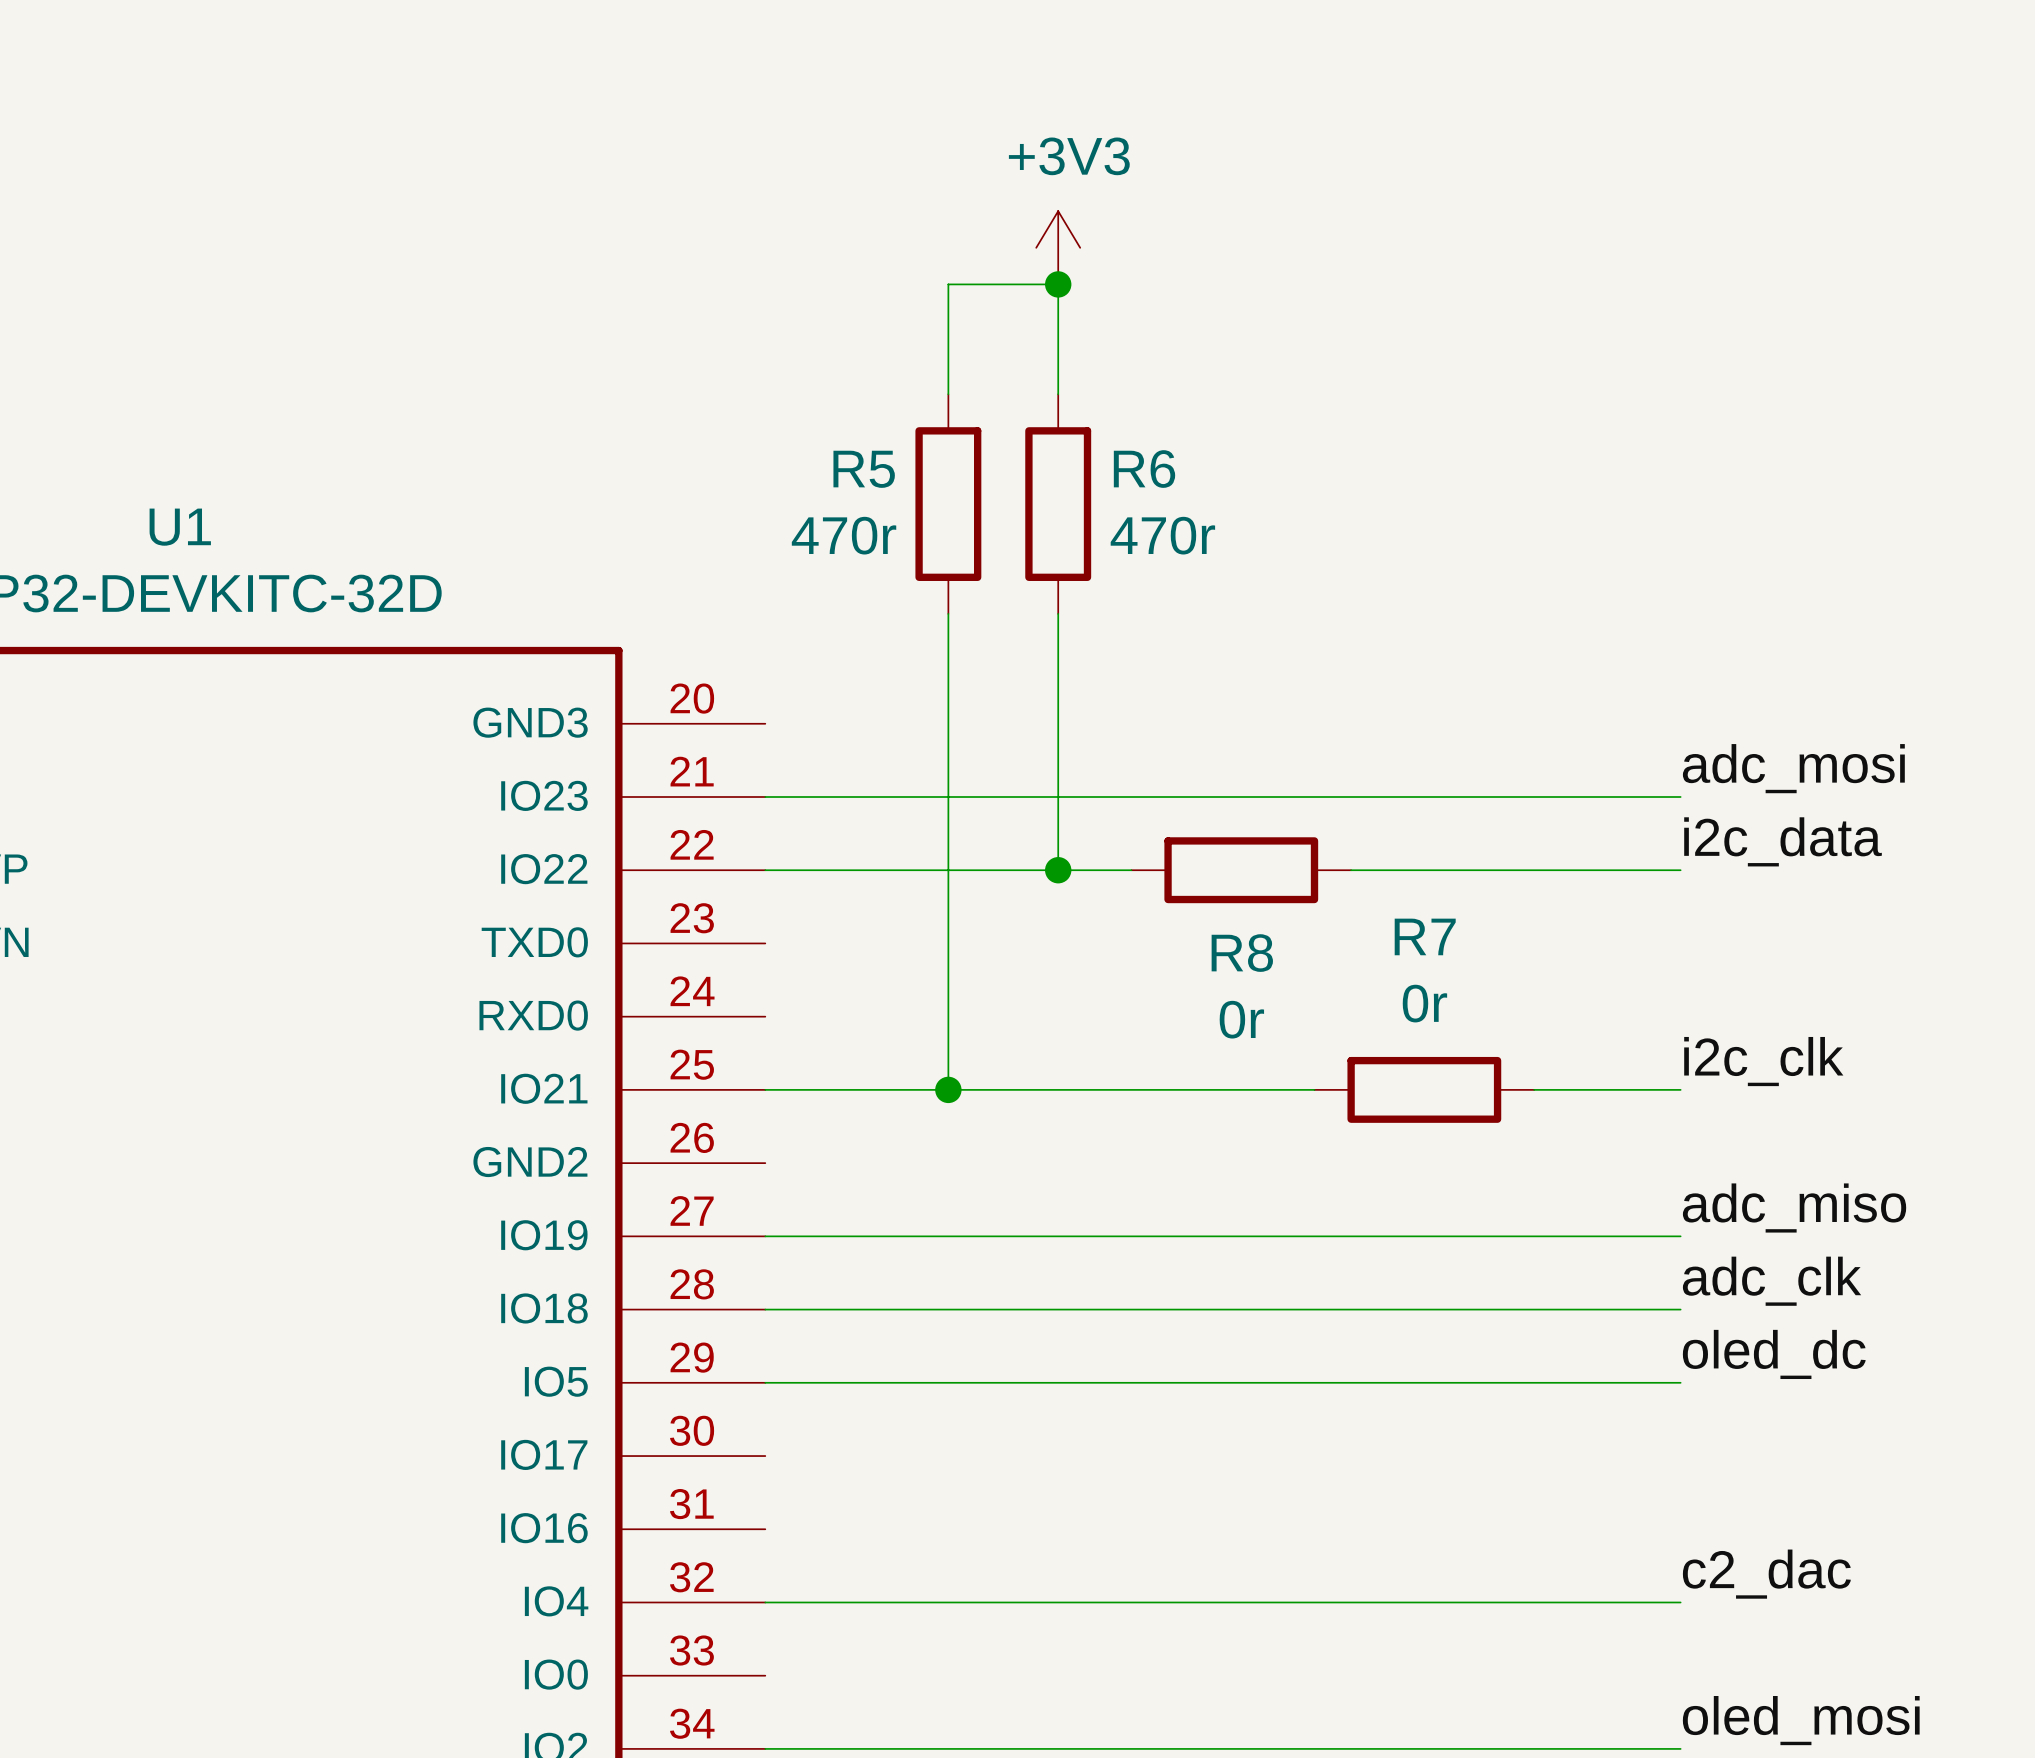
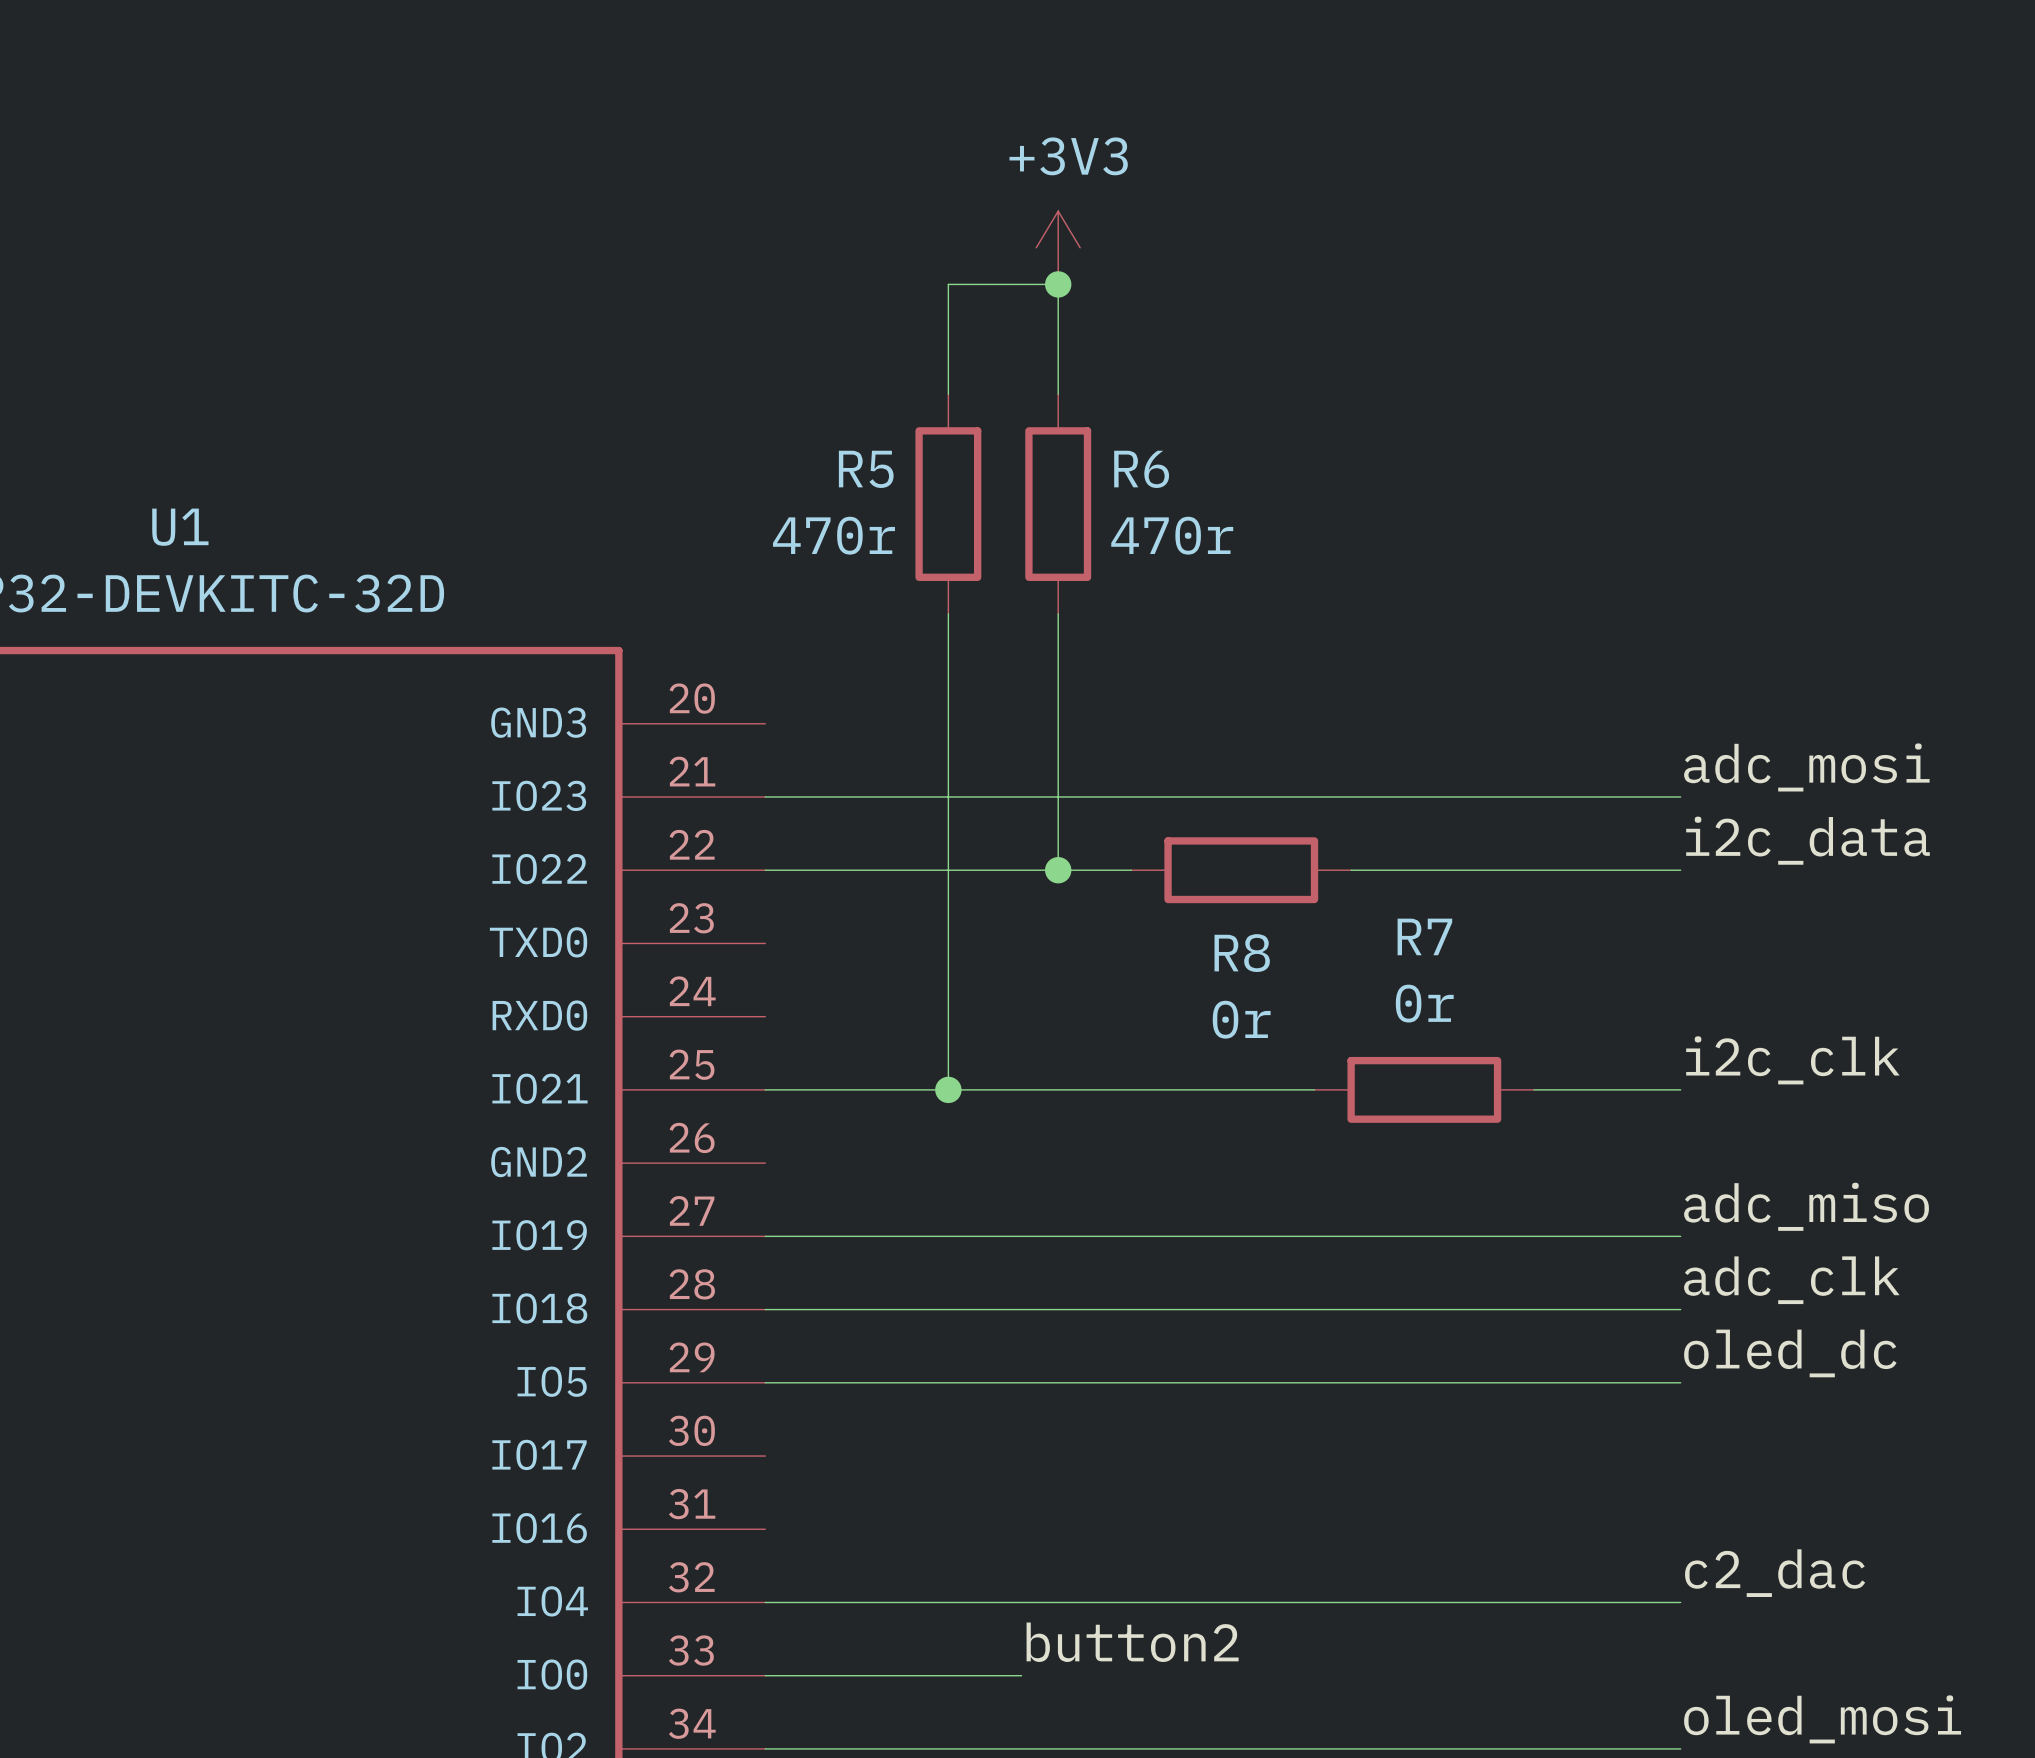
label: none -> button2 (1132, 1642)
wire: none -> (765, 1675) (1021, 1675)

